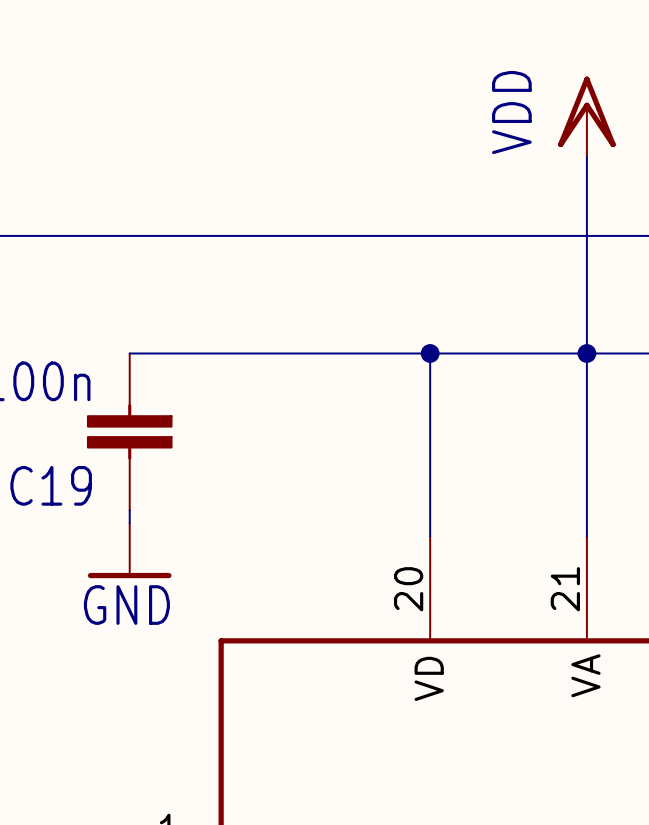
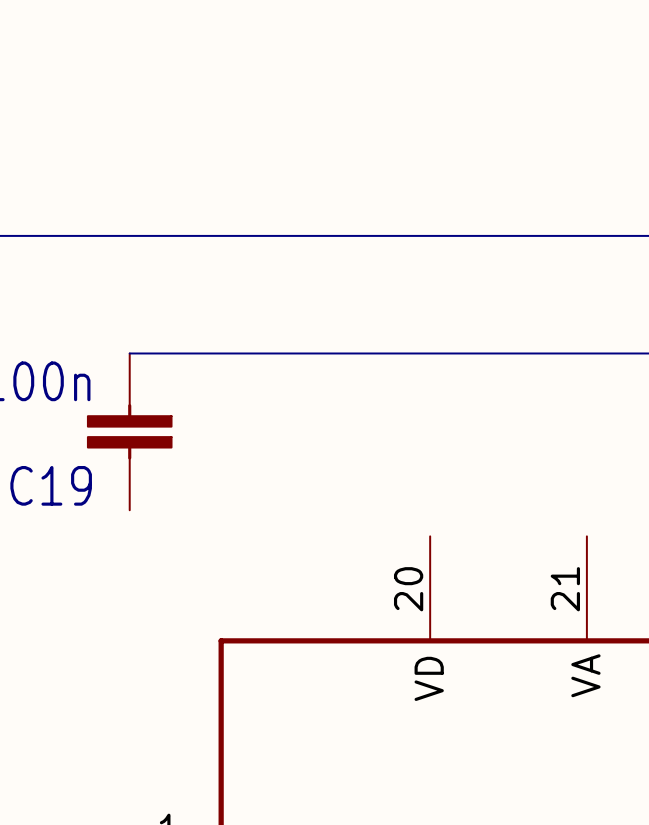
power symbol: VDD (586, 117) -> none
wire: (586, 157) (586, 536) -> none
wire: (430, 353) (430, 536) -> none
junction: (430, 353) -> none
junction: (586, 353) -> none
wire: (129, 510) (129, 523) -> none
power symbol: GND (129, 550) -> none

